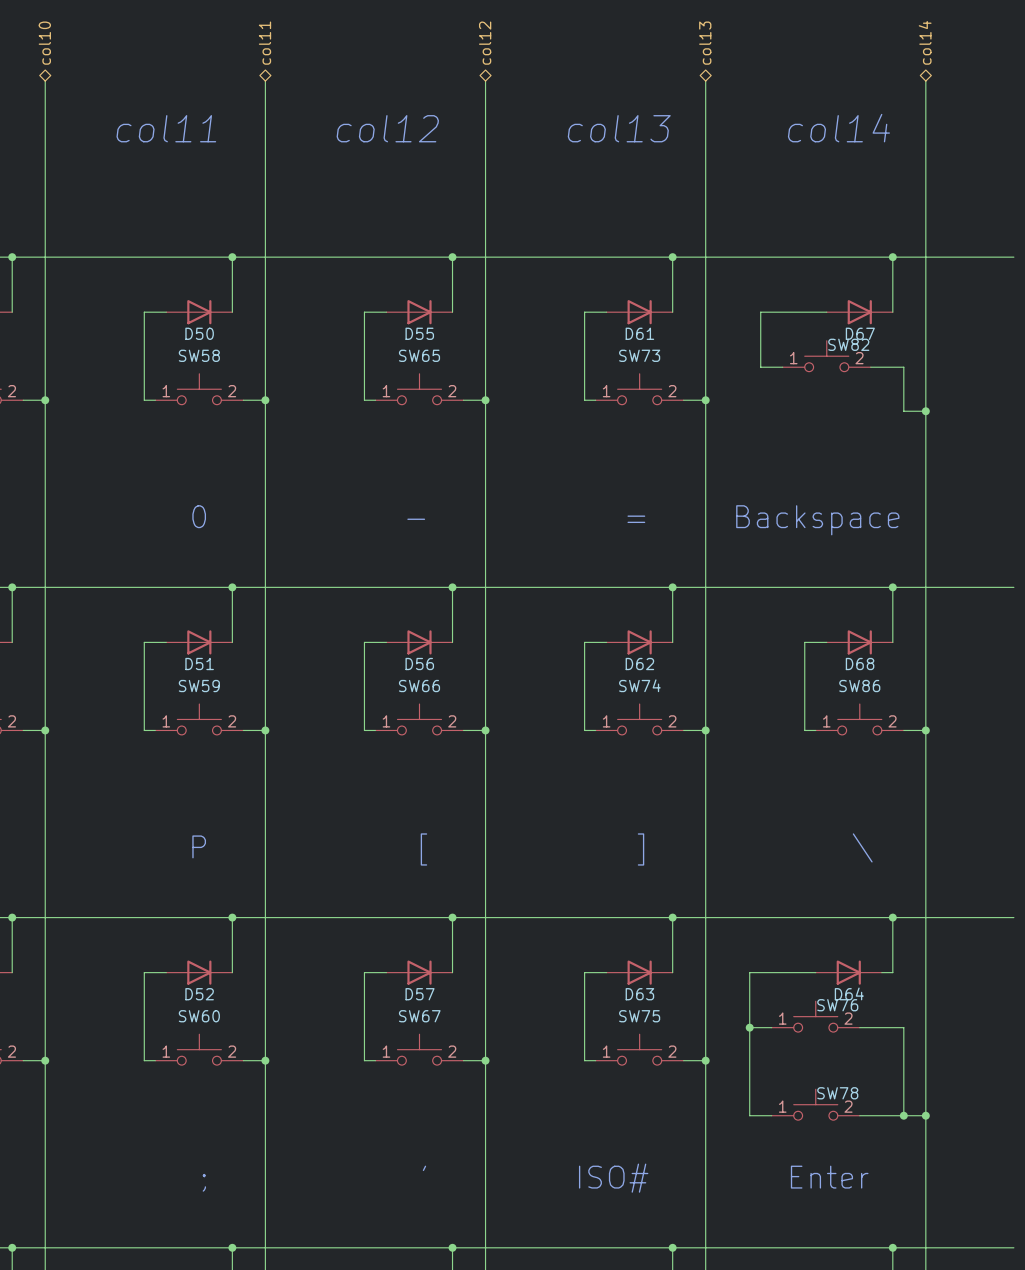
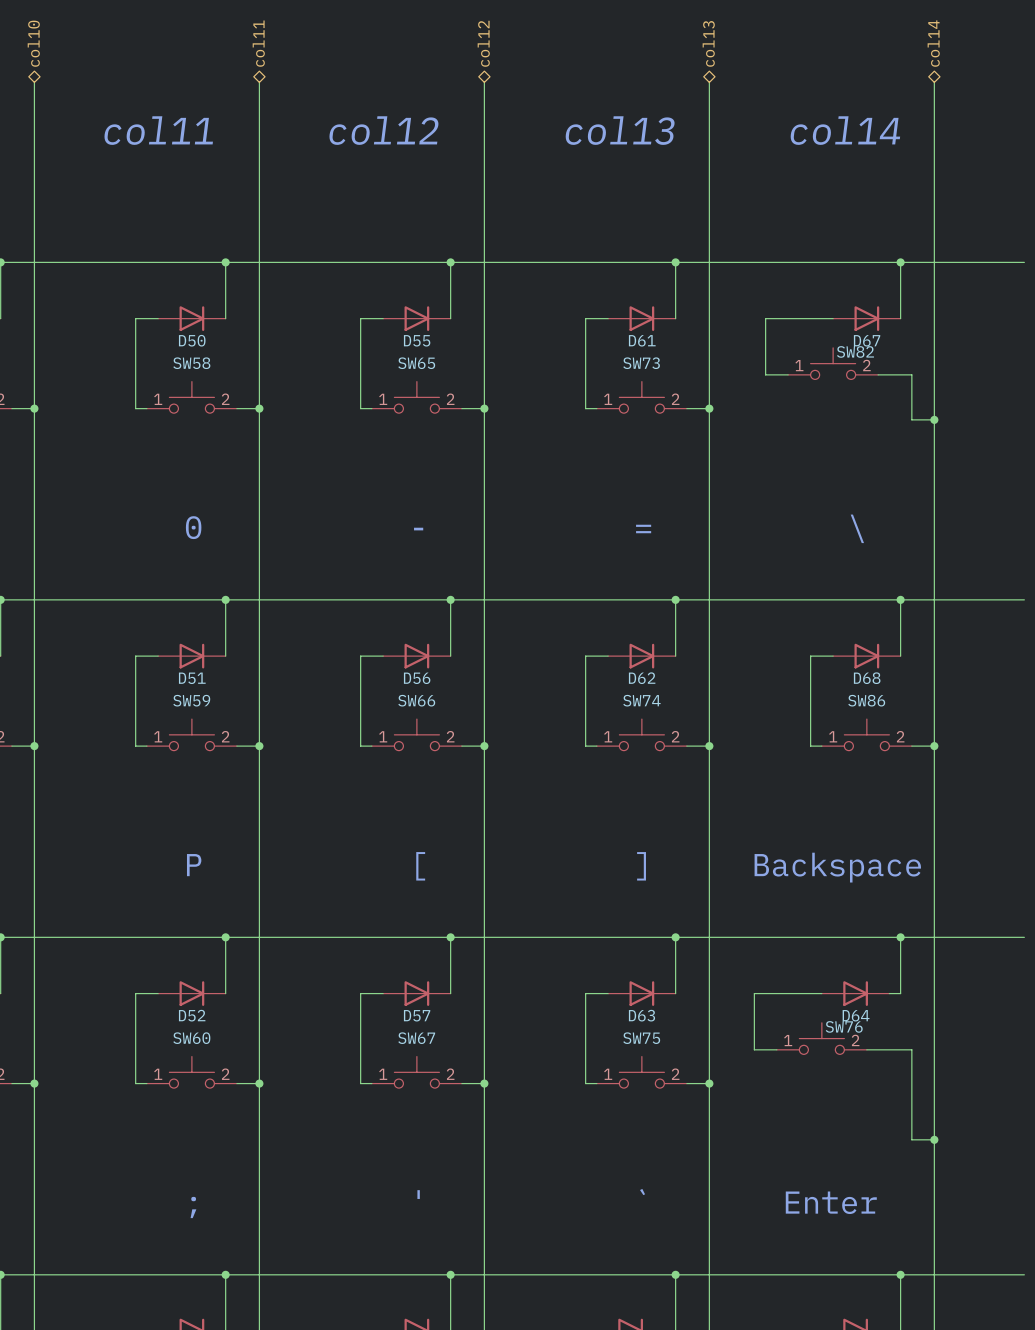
text: none -> \ (857, 528)
text: Backspace (817, 520) -> none
text: \ (862, 847) -> none
text: none -> Backspace (837, 867)
wire: (749, 1027) (749, 1115) (771, 1115) -> none
junction: (749, 1027) -> none
SW78: (815, 1104) -> none
wire: (859, 1115) (903, 1115) -> none
junction: (903, 1115) -> none
text: ISO# (613, 1178) -> ` (642, 1192)

